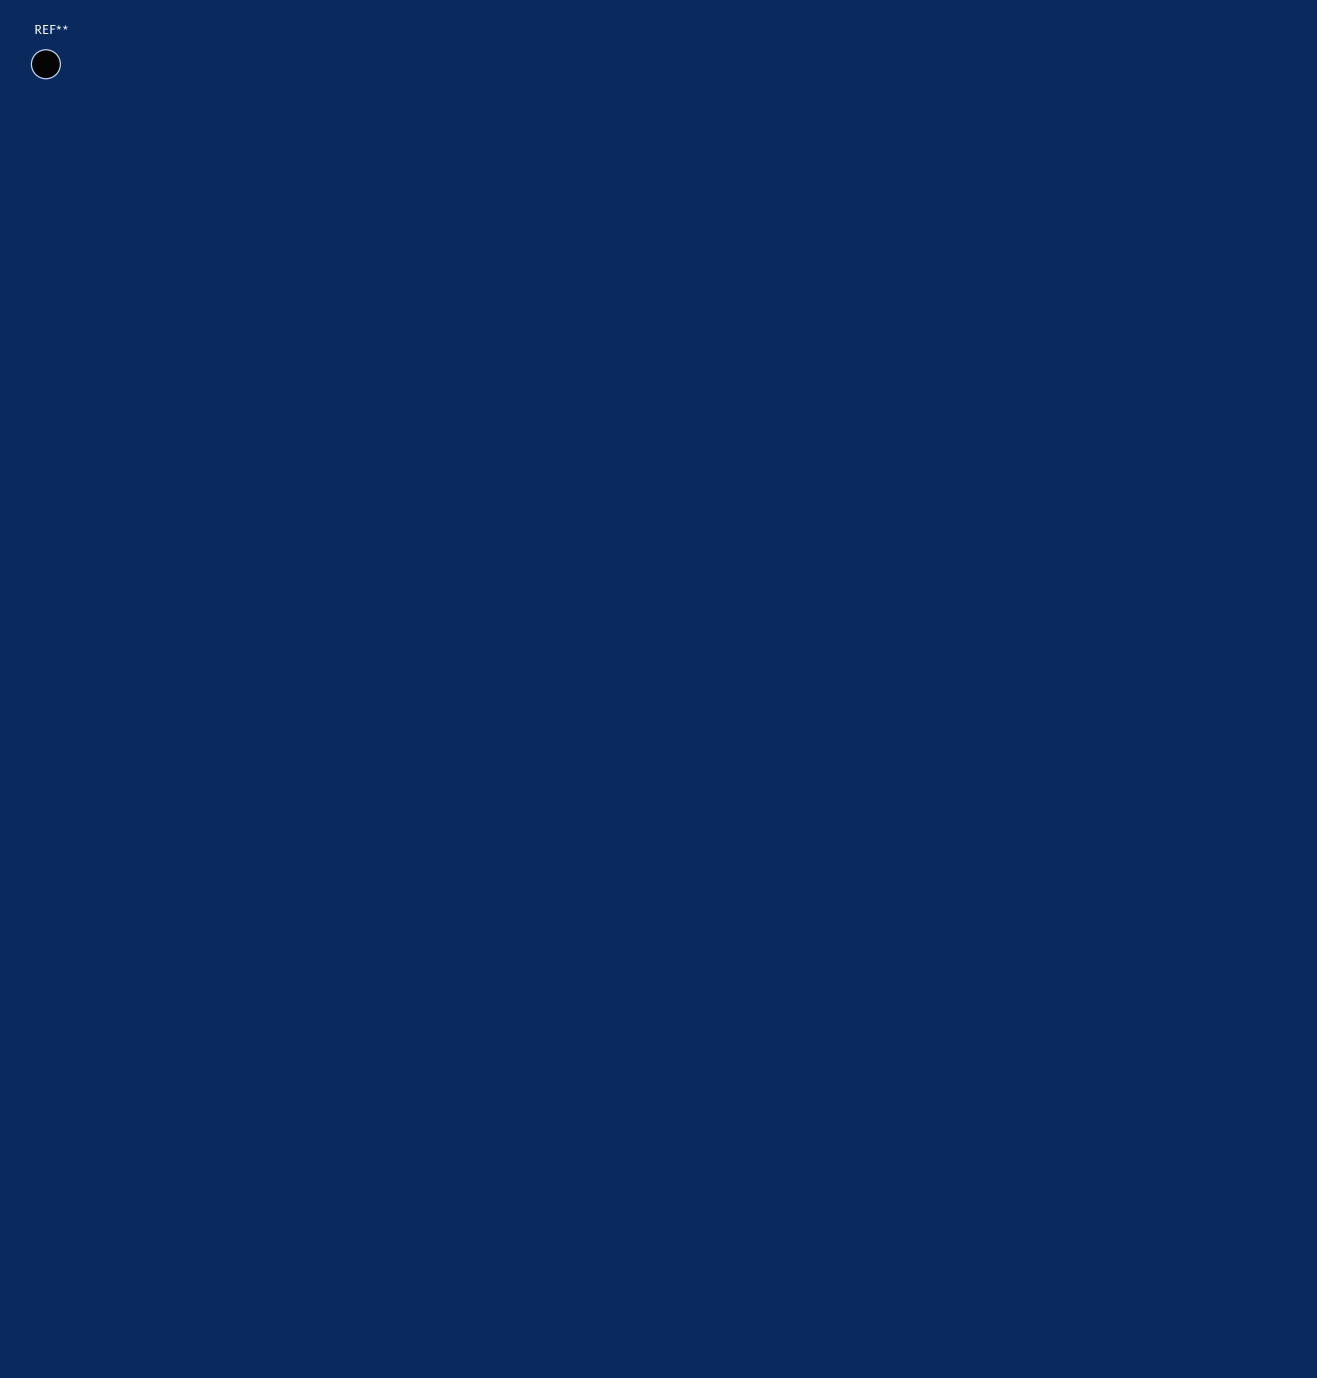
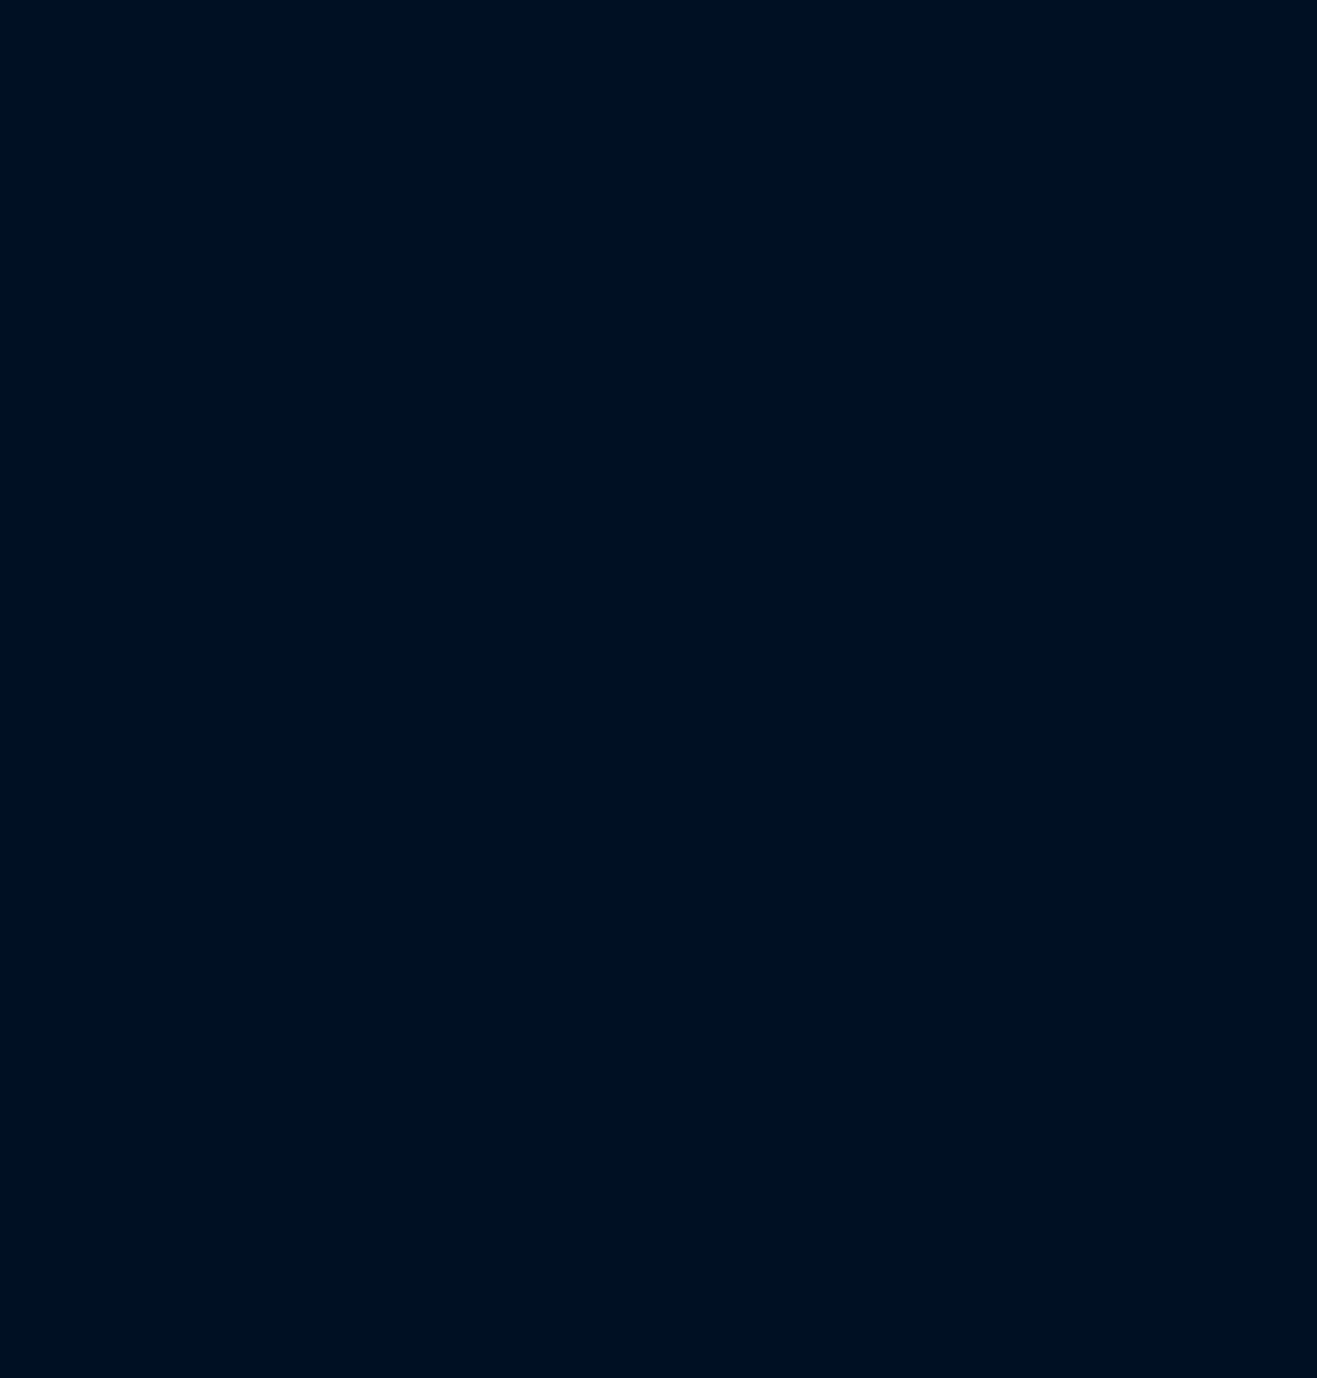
REF**: (45, 64) -> none

